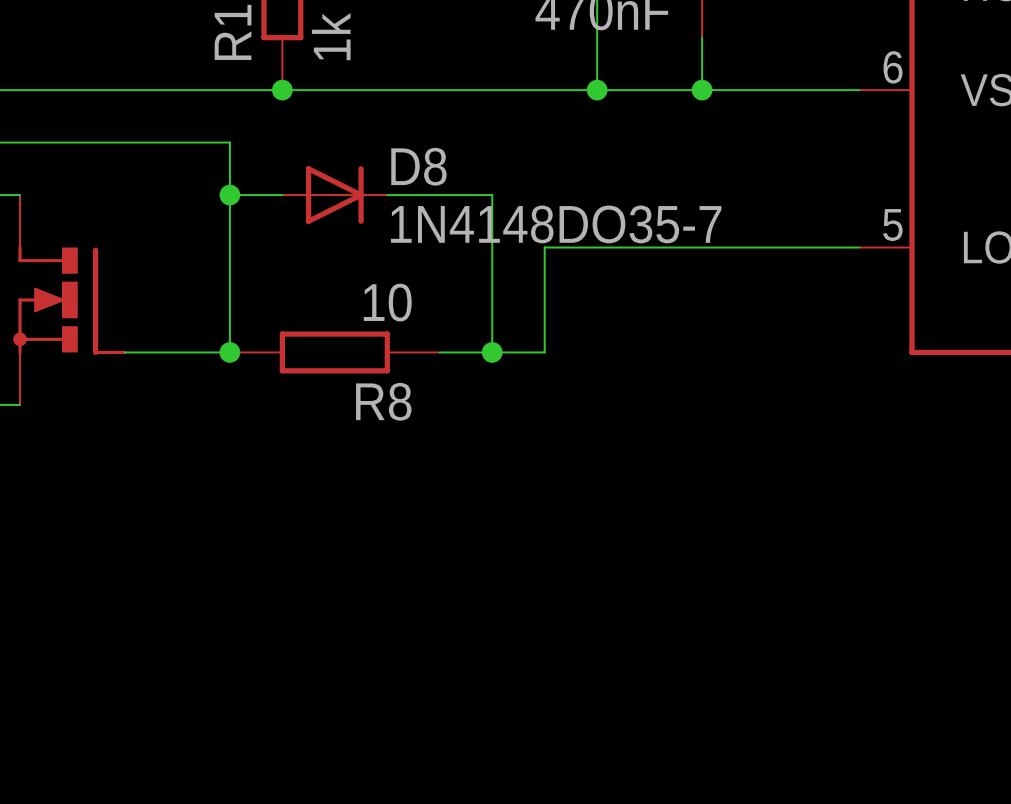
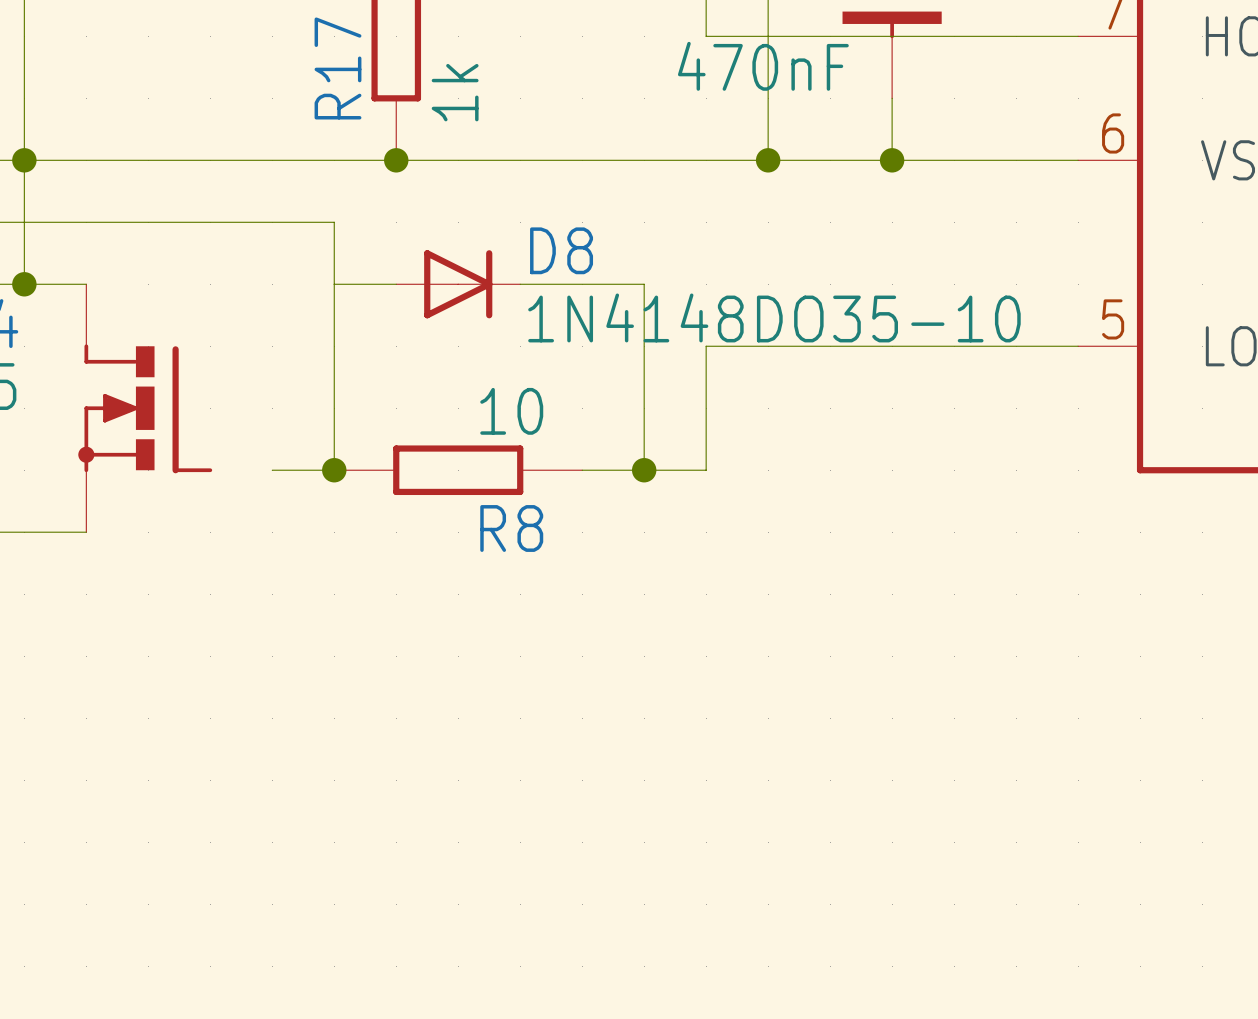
junction: (229, 195) -> none
D8 value: 1N4148DO35-7 (556, 224) -> 1N4148DO35-10 (774, 317)
wire: (124, 352) (177, 352) -> none

